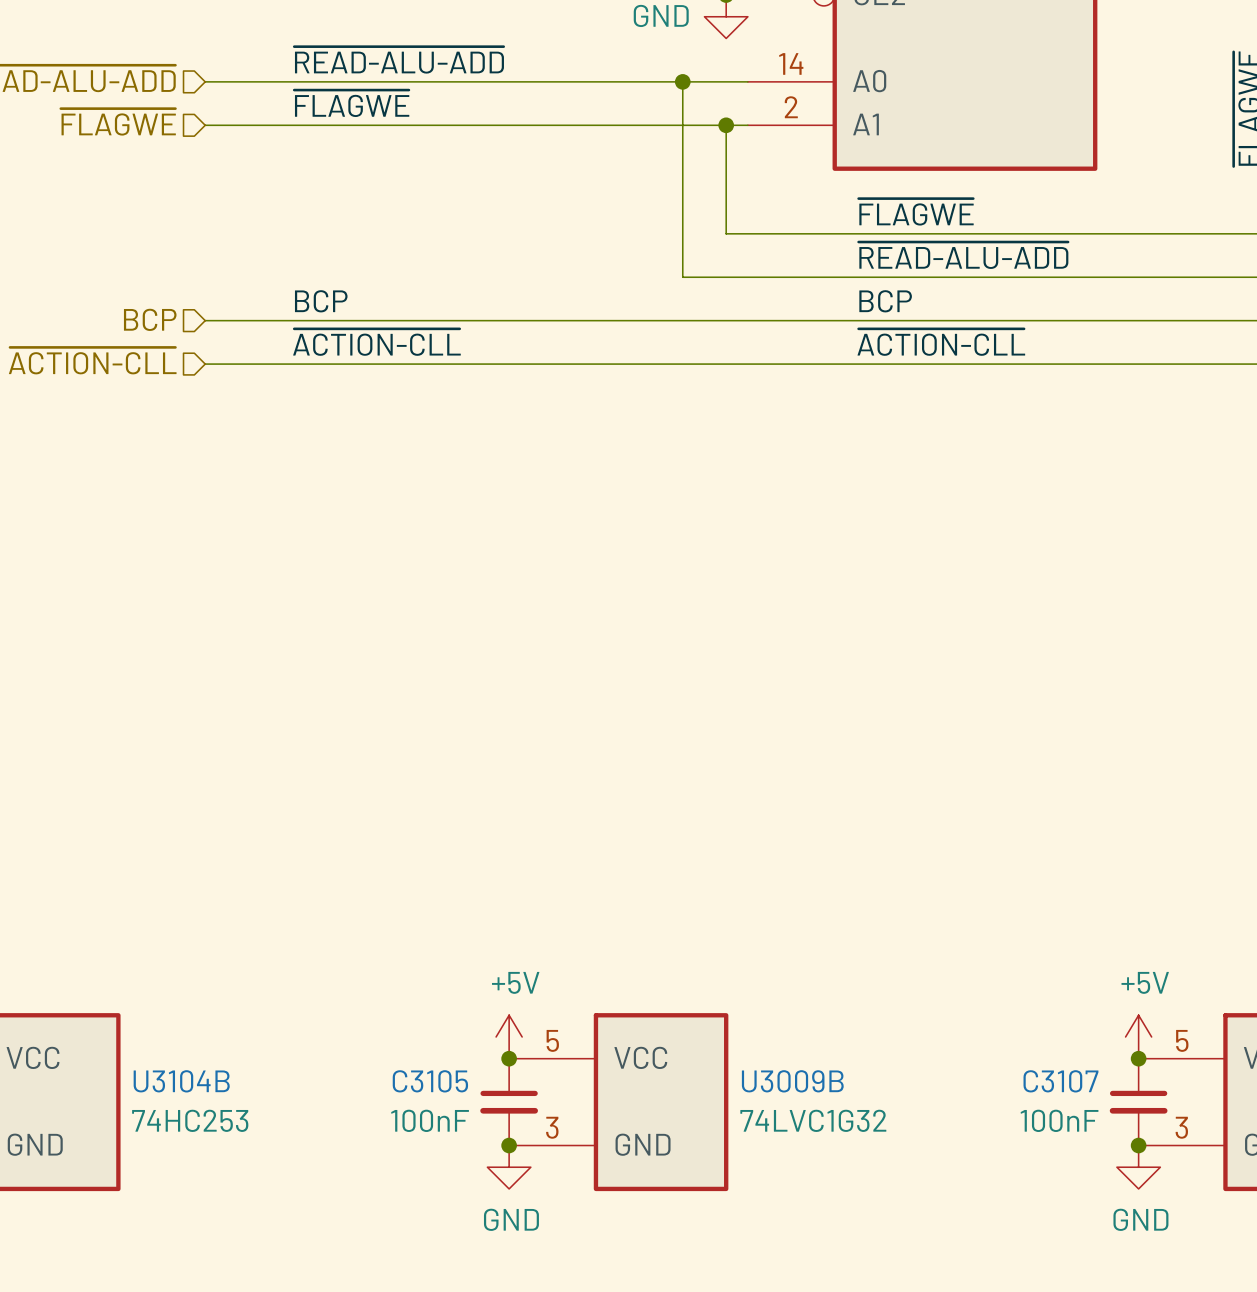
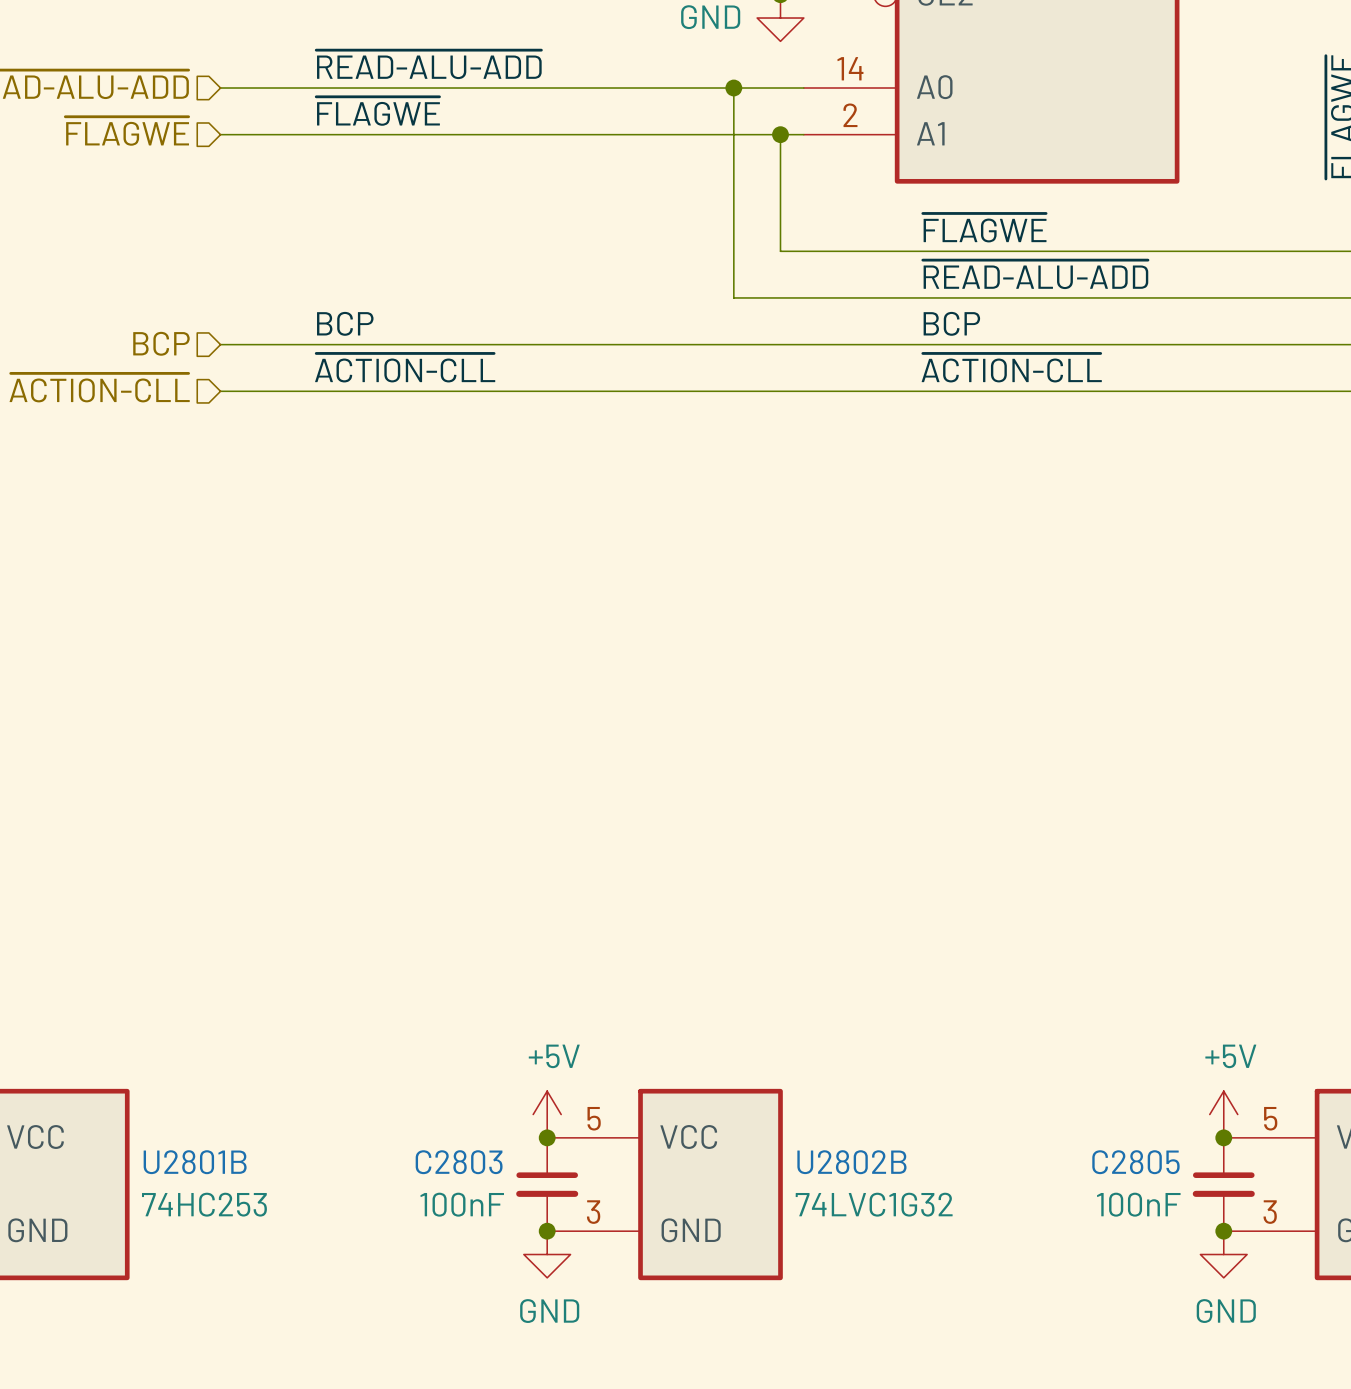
U3104B name: U3104B (181, 1081) -> U2801B (195, 1162)
C3105 name: C3105 (430, 1081) -> C2803 (459, 1162)
U3009B name: U3009B (792, 1081) -> U2802B (851, 1162)
C3107 name: C3107 (1060, 1081) -> C2805 (1135, 1162)

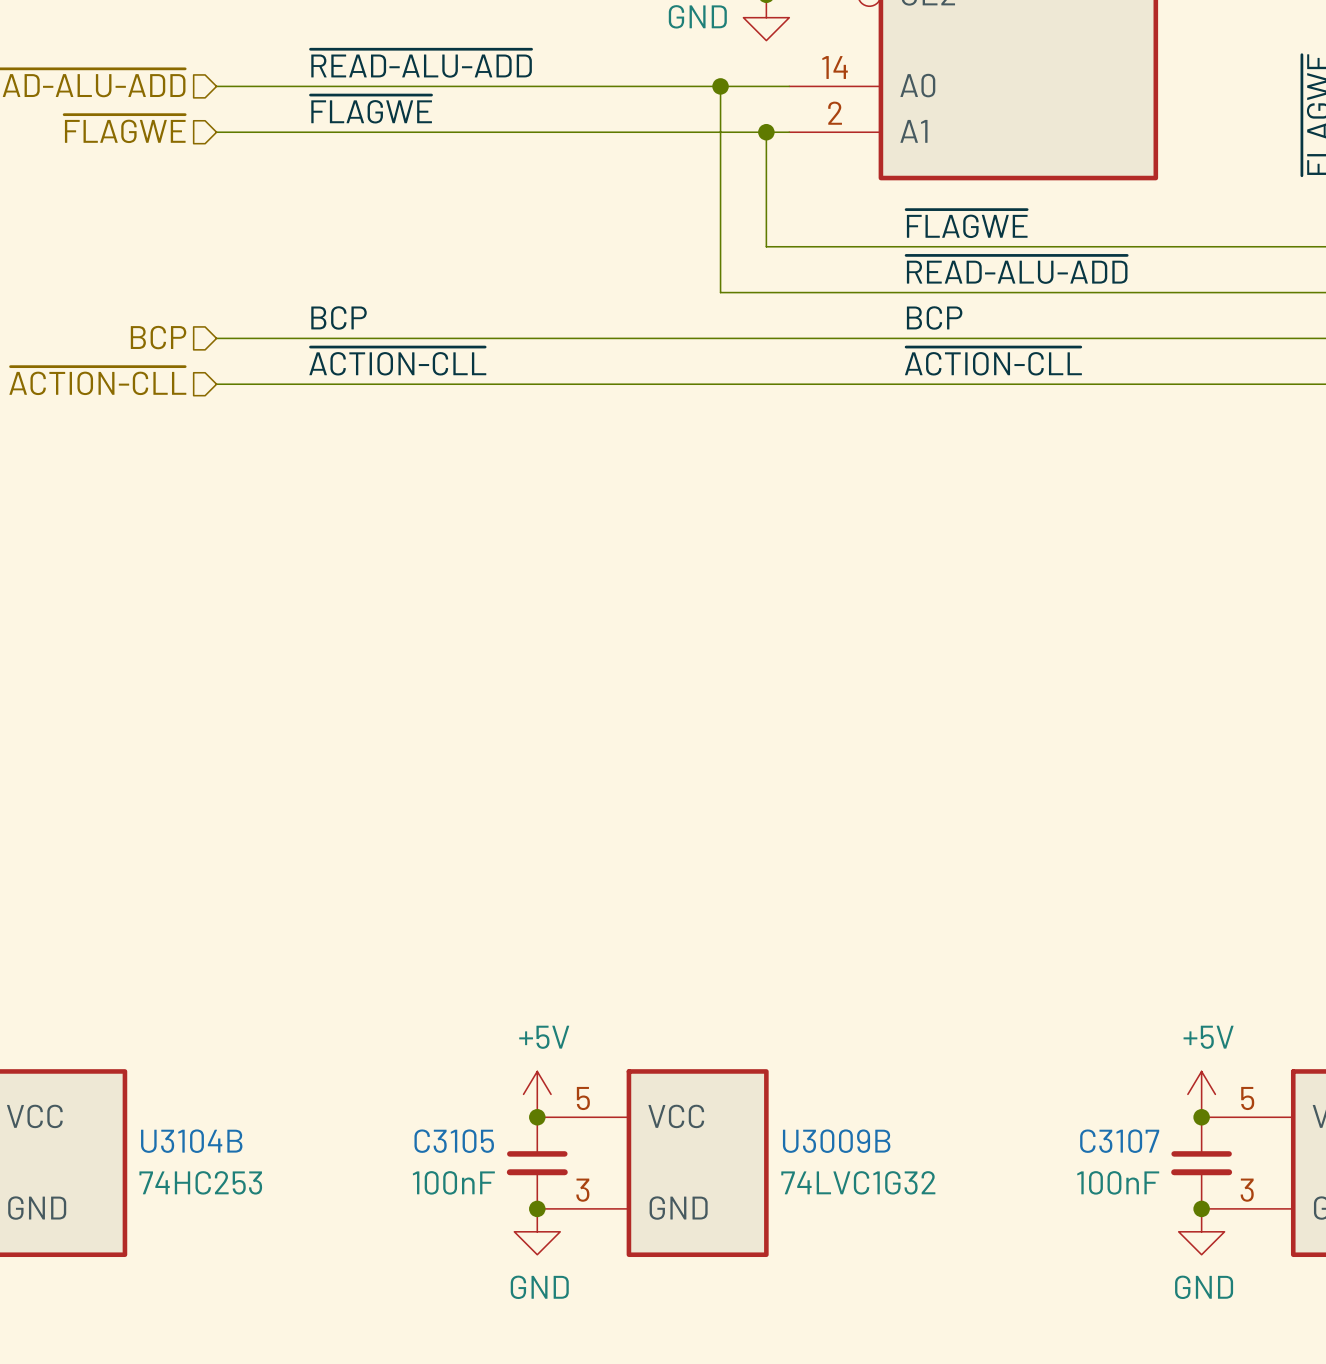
U2801B name: U2801B (195, 1162) -> U3104B (191, 1141)
C2803 name: C2803 (459, 1162) -> C3105 (454, 1141)
U2802B name: U2802B (851, 1162) -> U3009B (836, 1141)
C2805 name: C2805 (1135, 1162) -> C3107 (1119, 1141)

